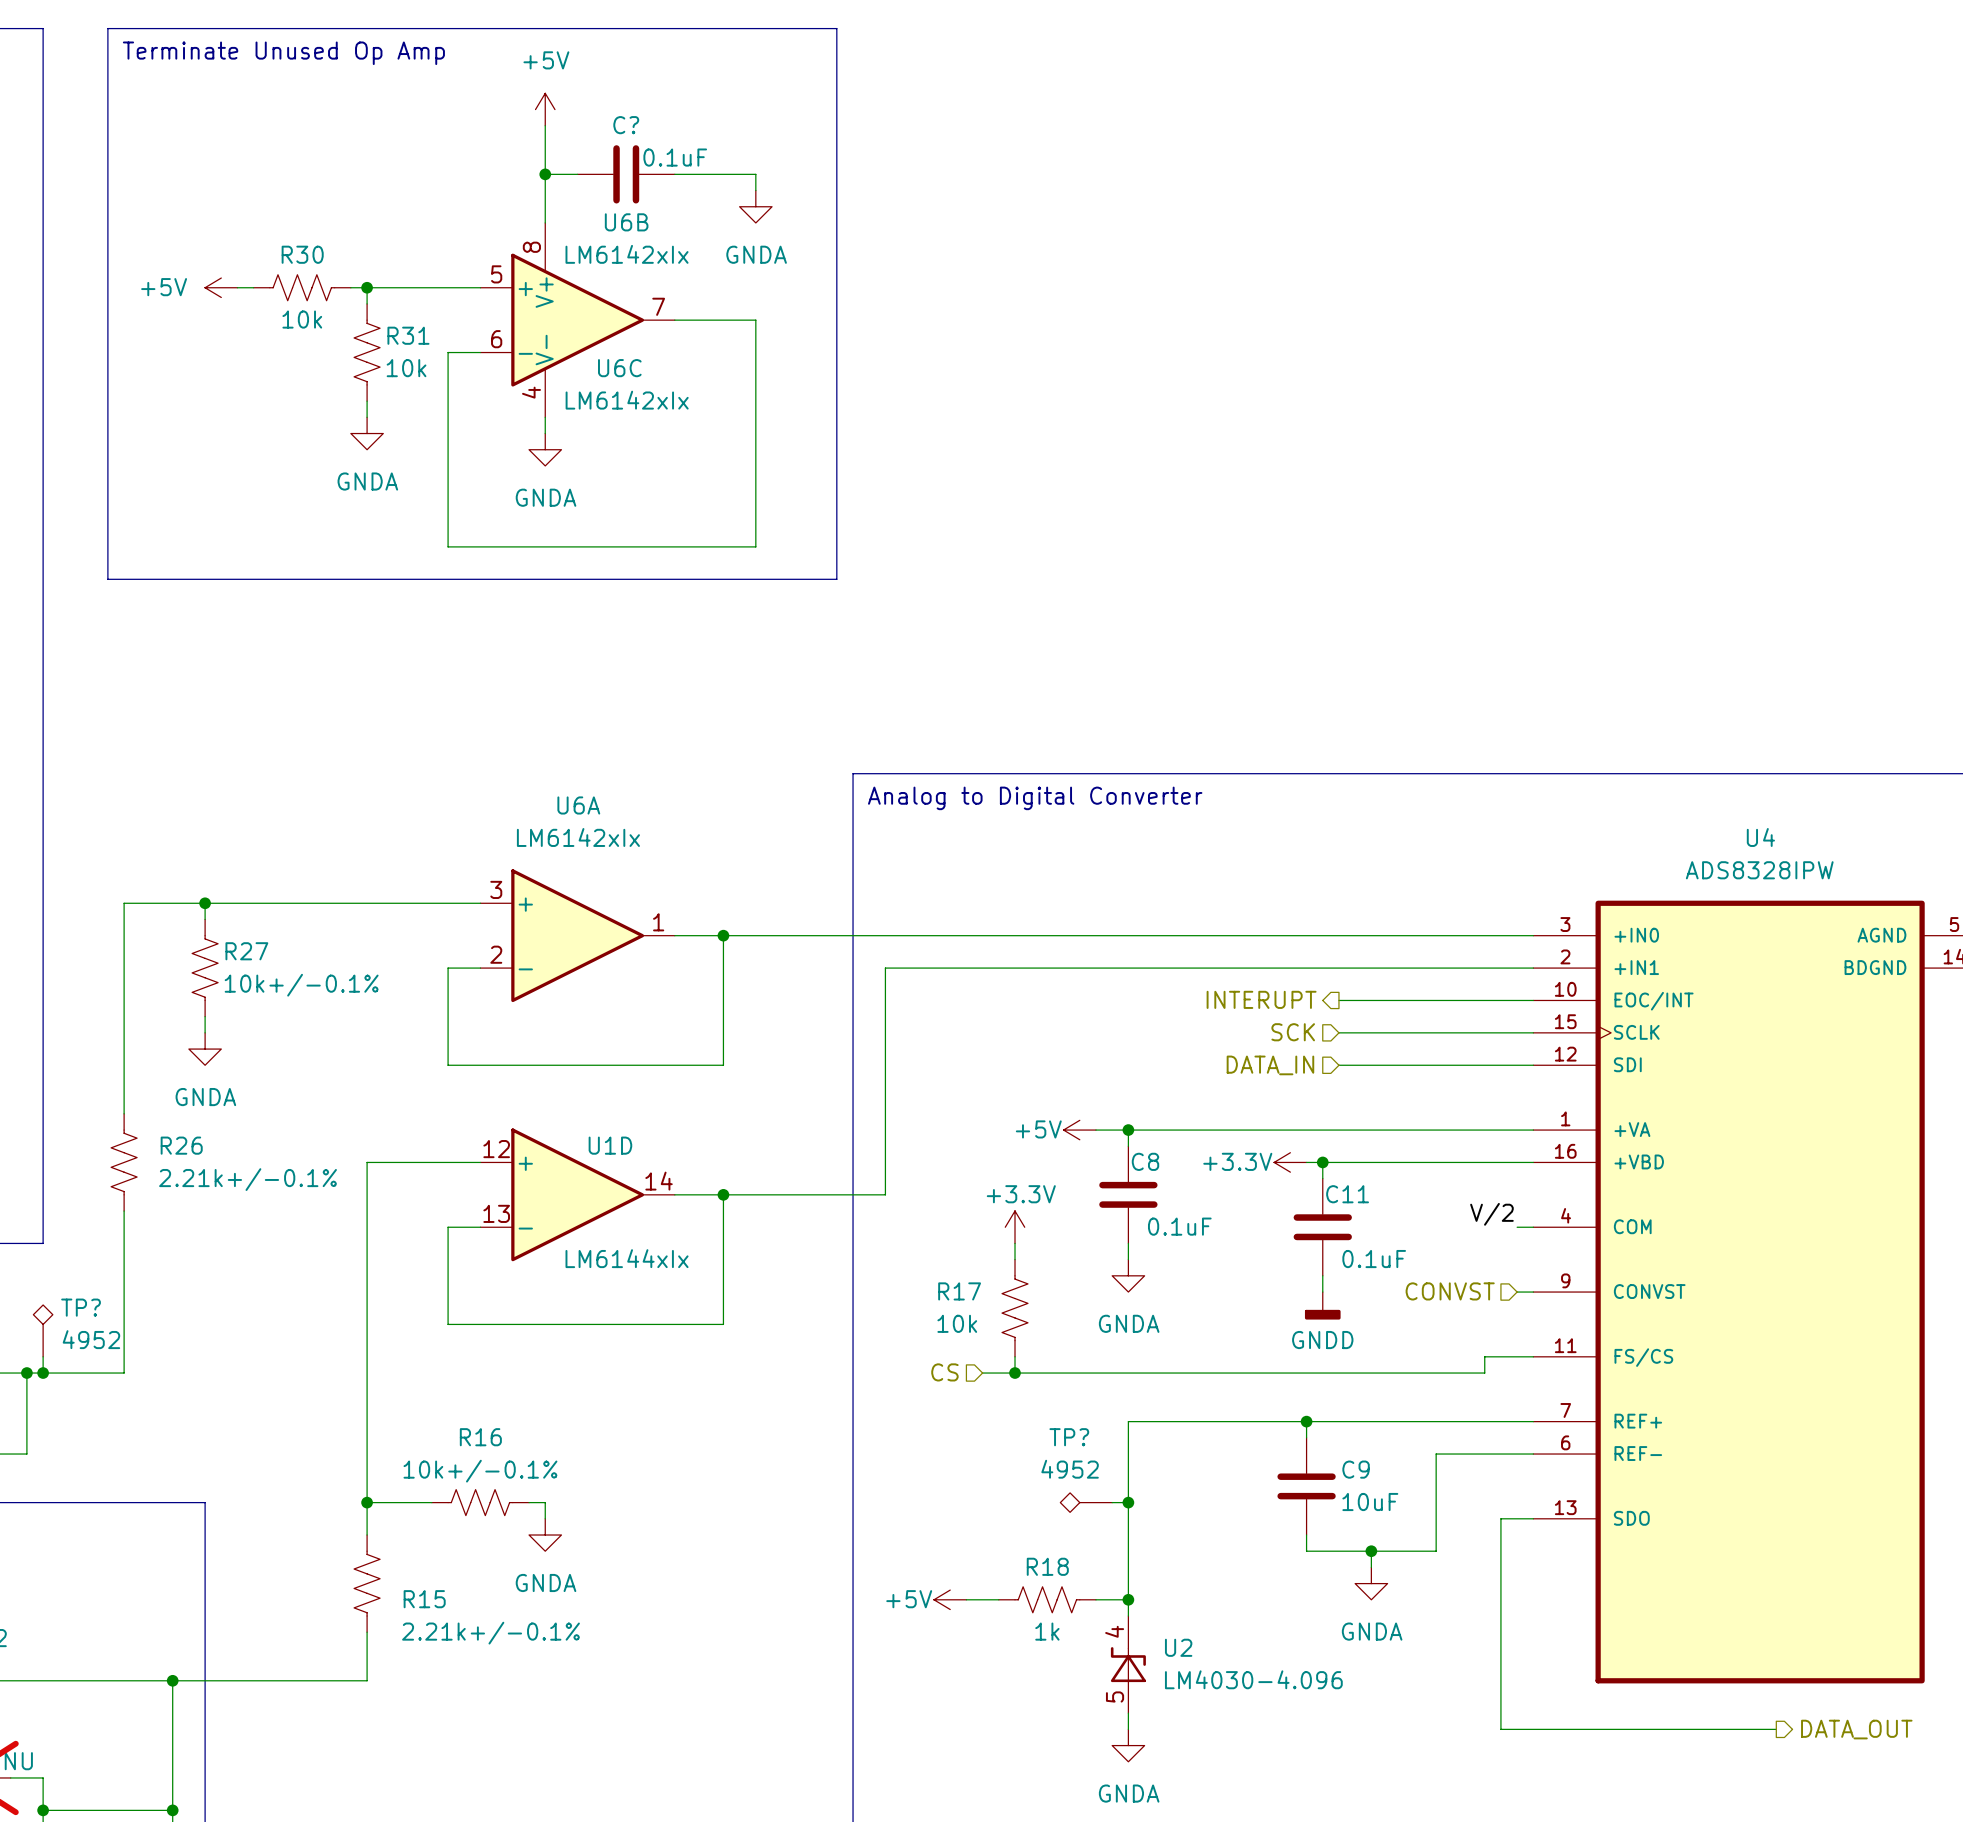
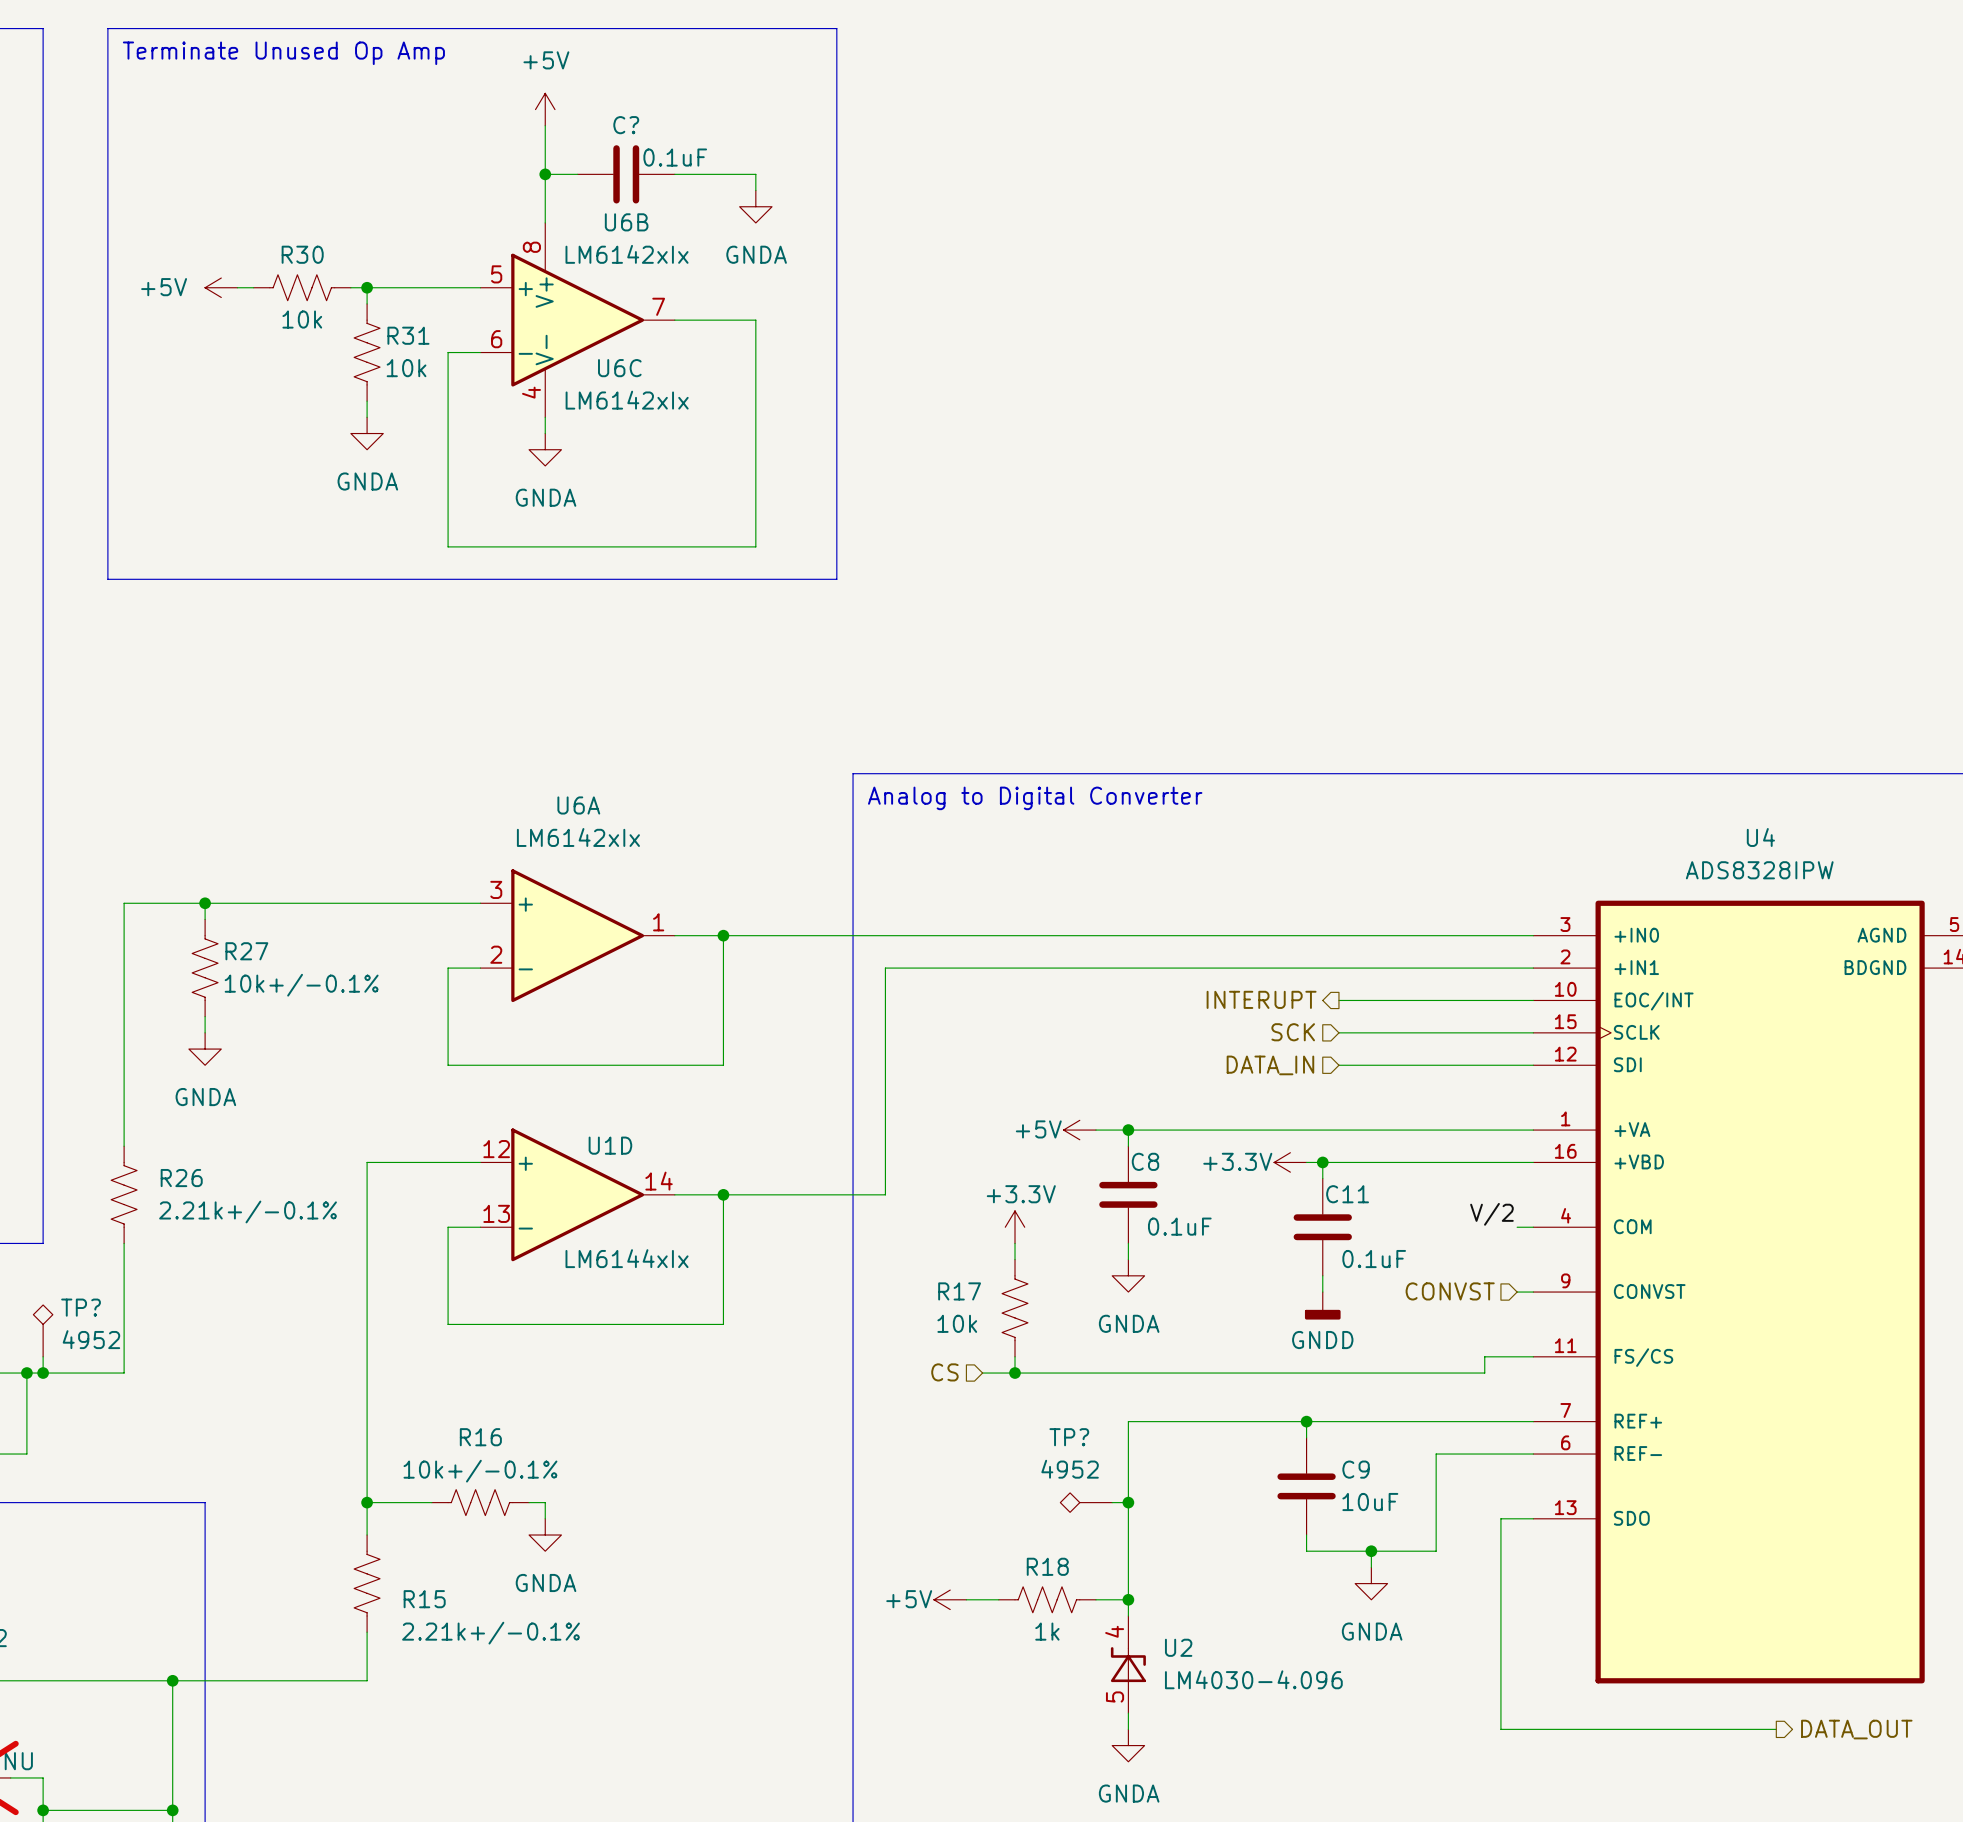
R26 position: (124, 1162) -> (124, 1194)

